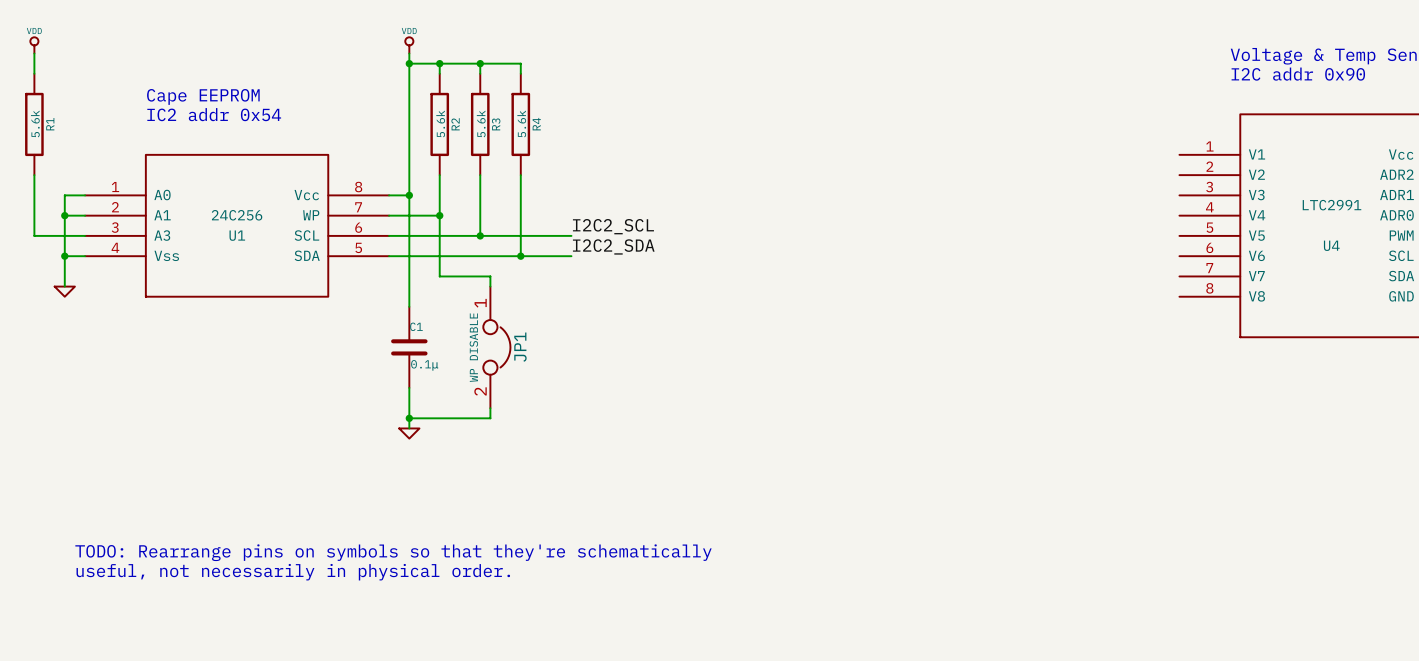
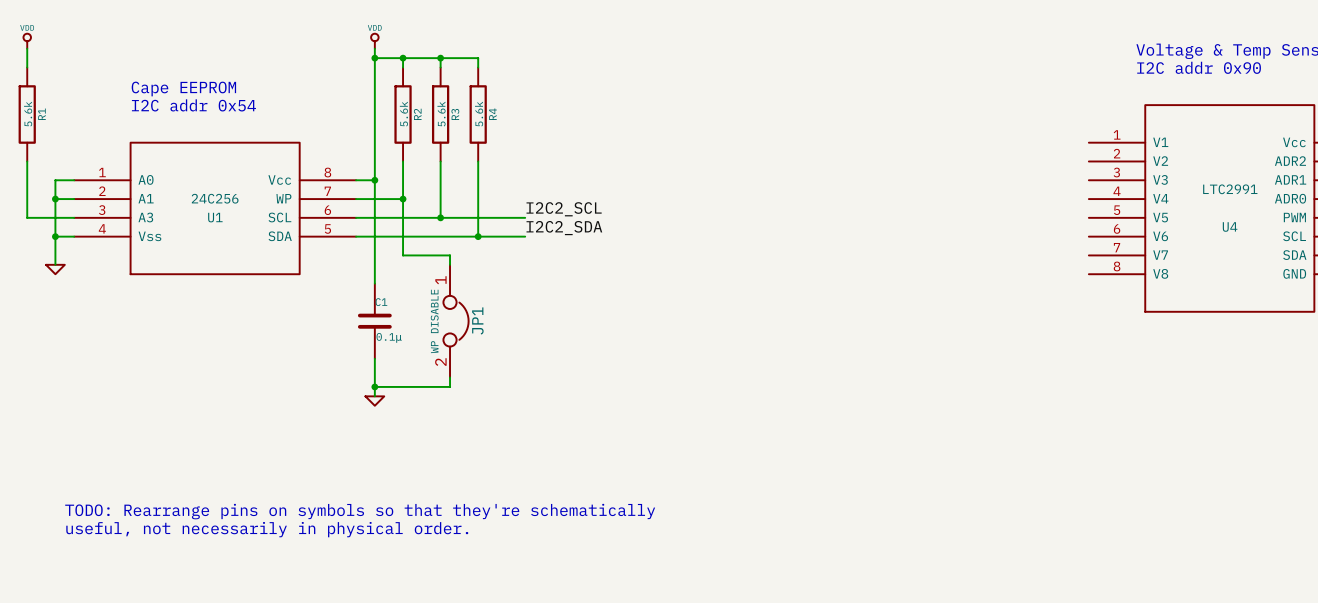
text: IC2 addr 0x54 (214, 114) -> I2C addr 0x54 (193, 105)

